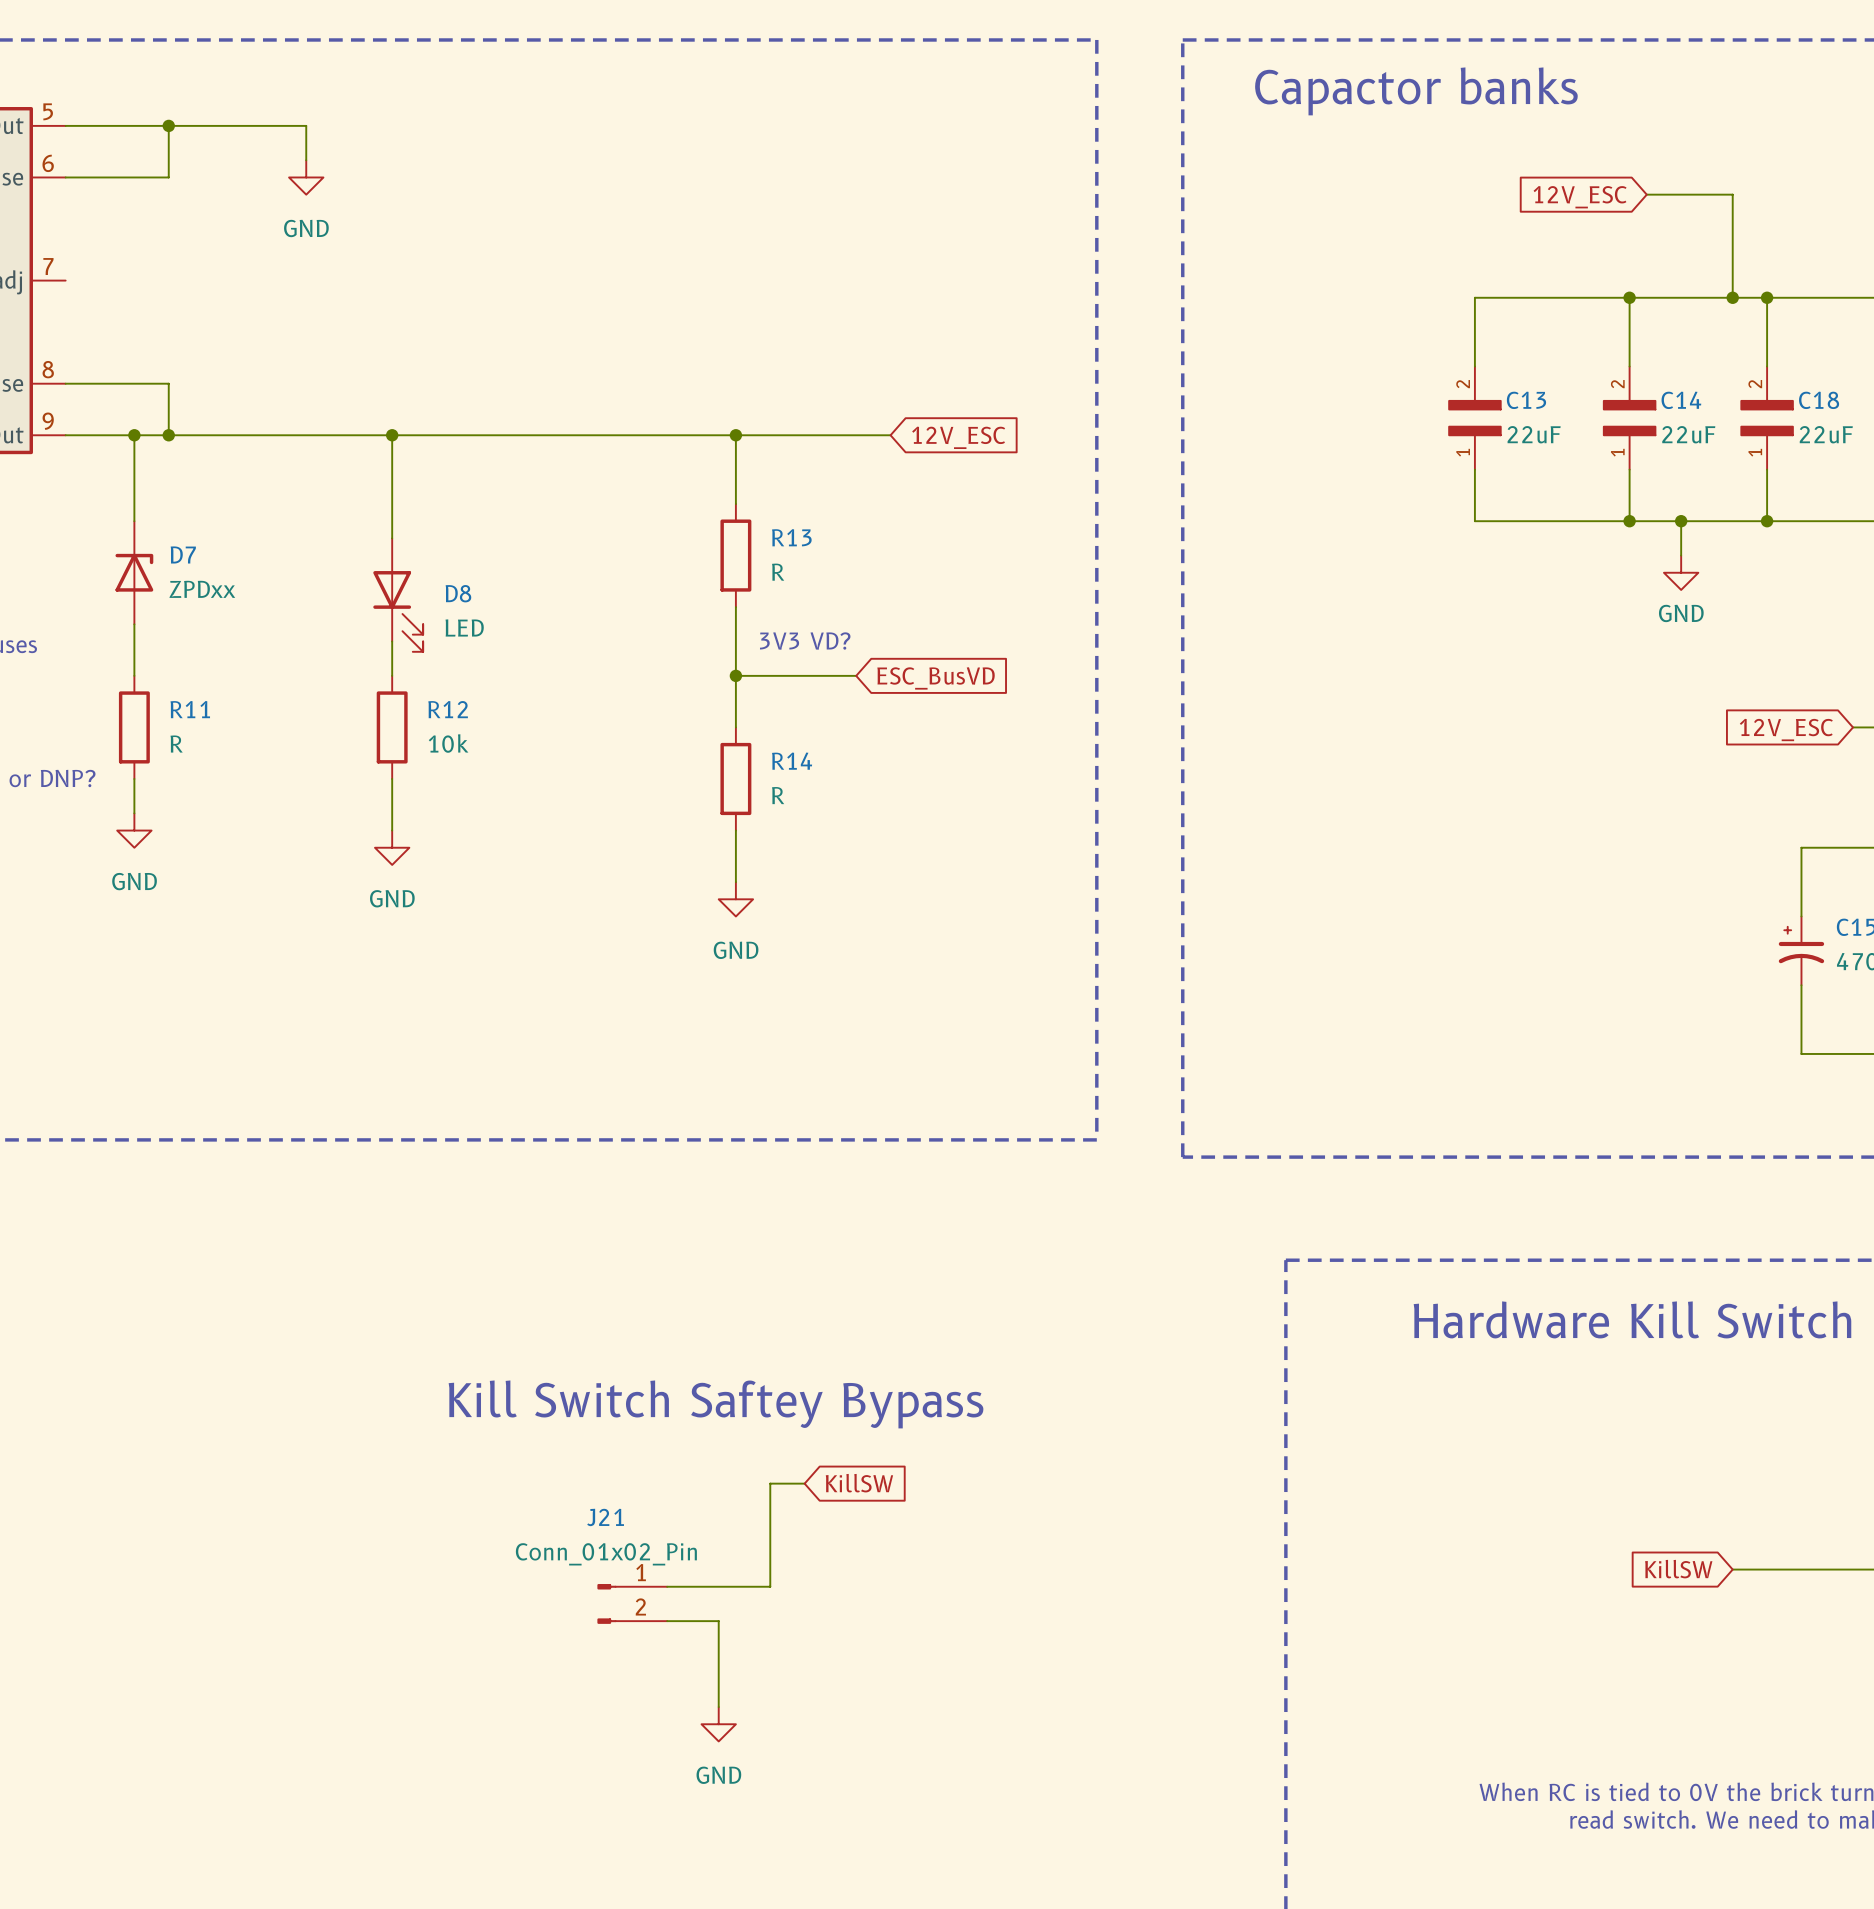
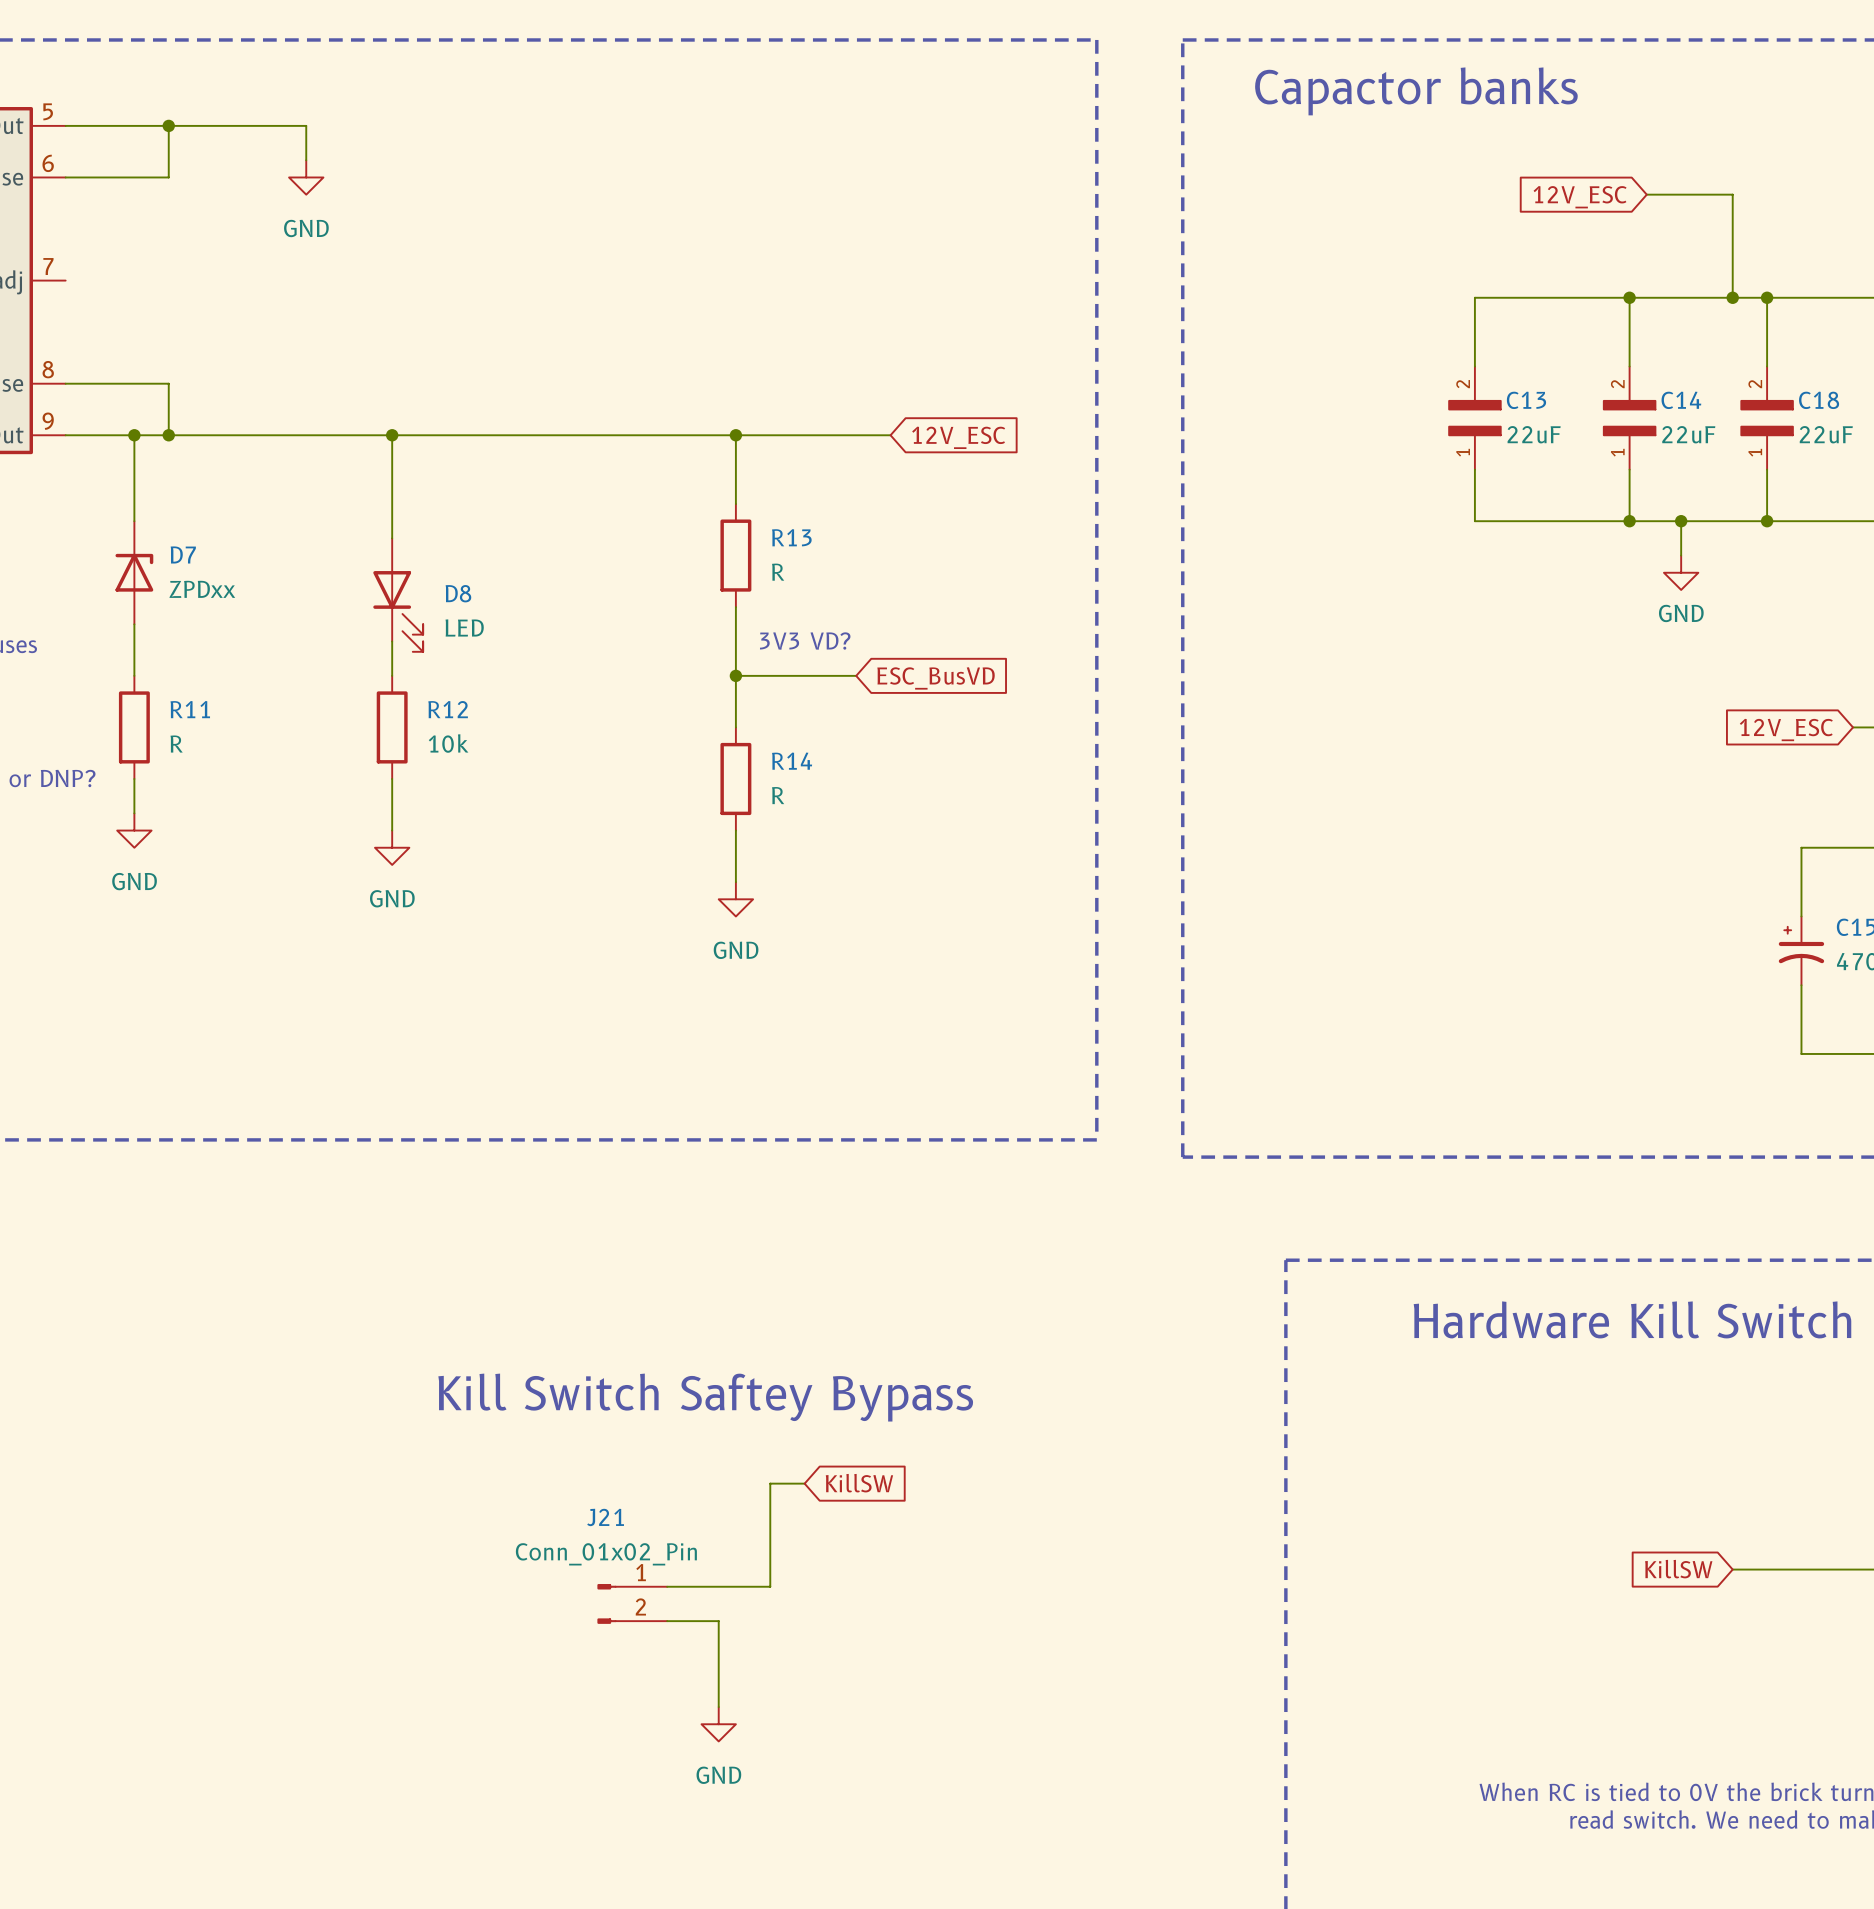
text position: Kill Switch Saftey Bypass (716, 1404) -> Kill Switch Saftey Bypass (705, 1397)

